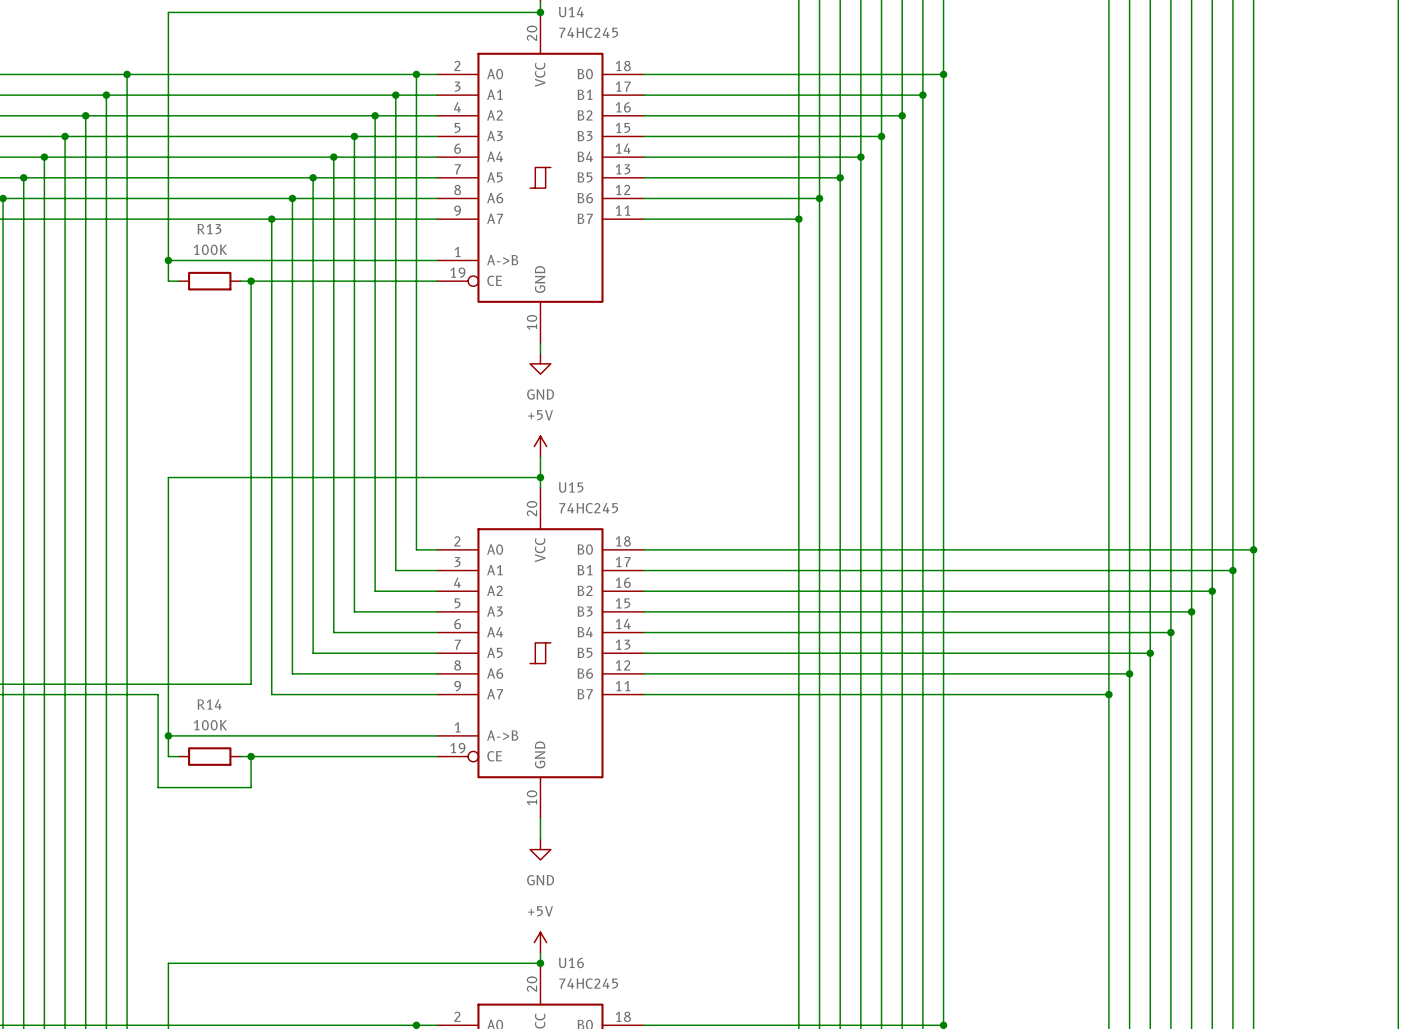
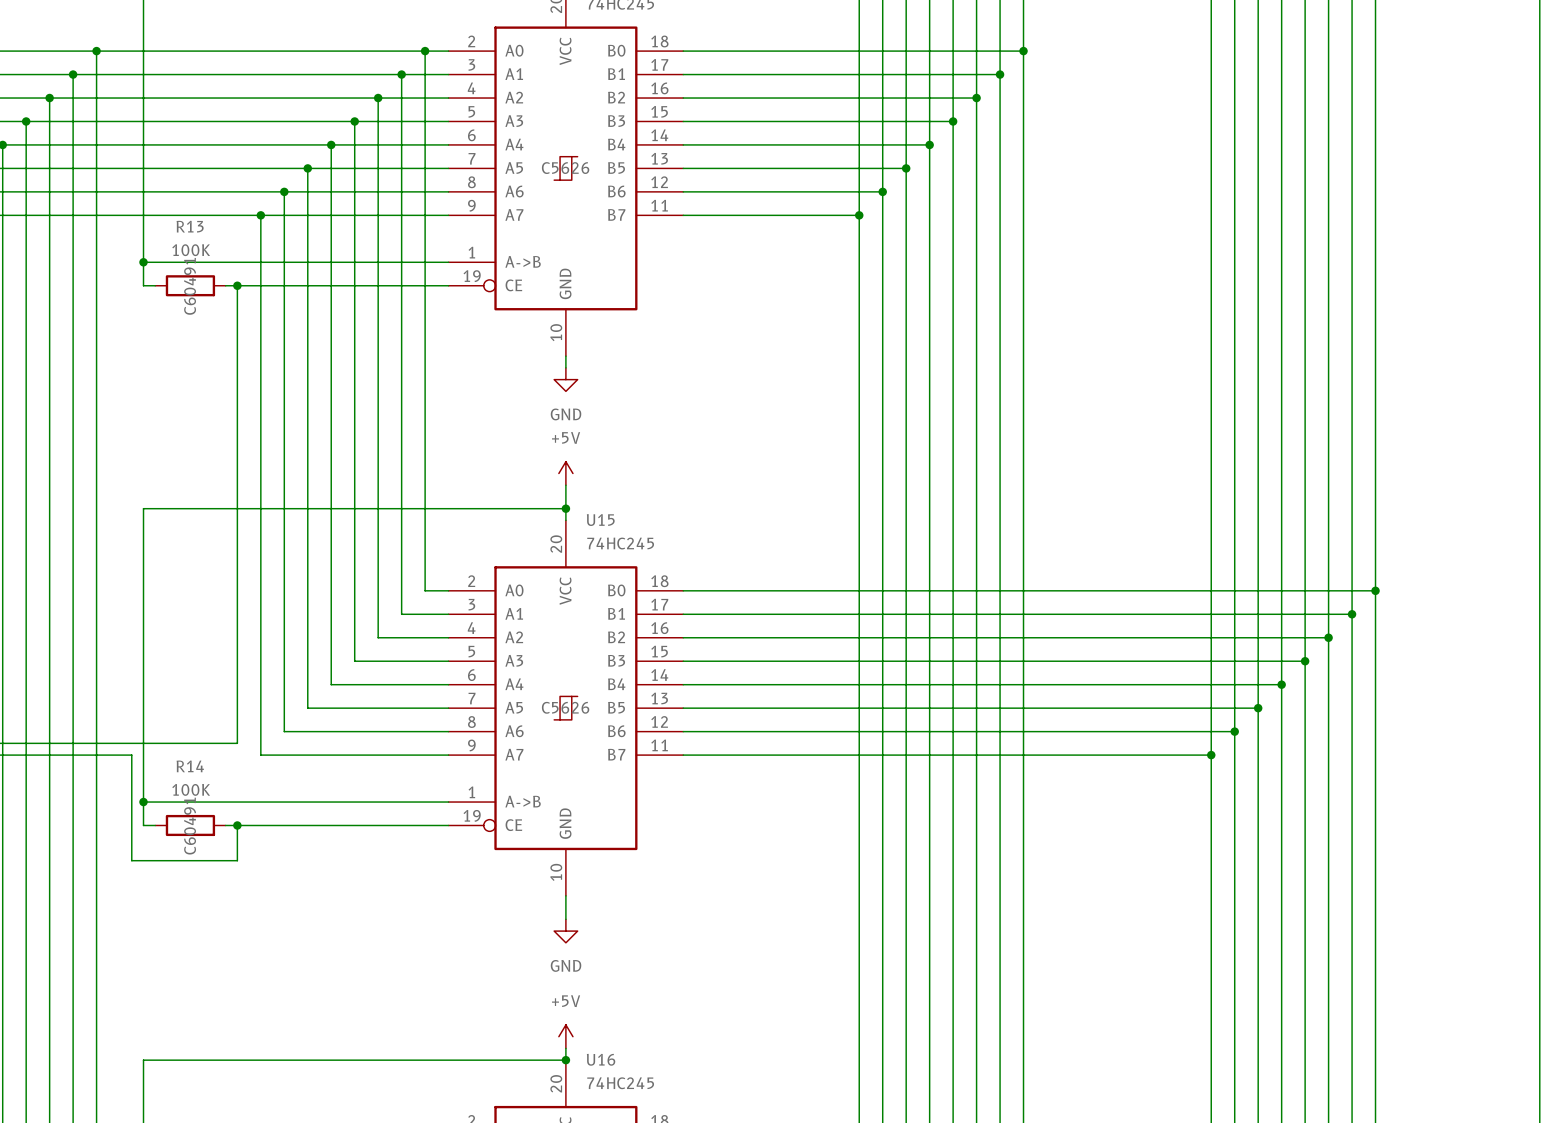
U14 text: none -> C5626 (565, 168)
R13 text: none -> C60491 (190, 286)
U15 text: none -> C5626 (565, 707)
R14 text: none -> C60491 (190, 826)

